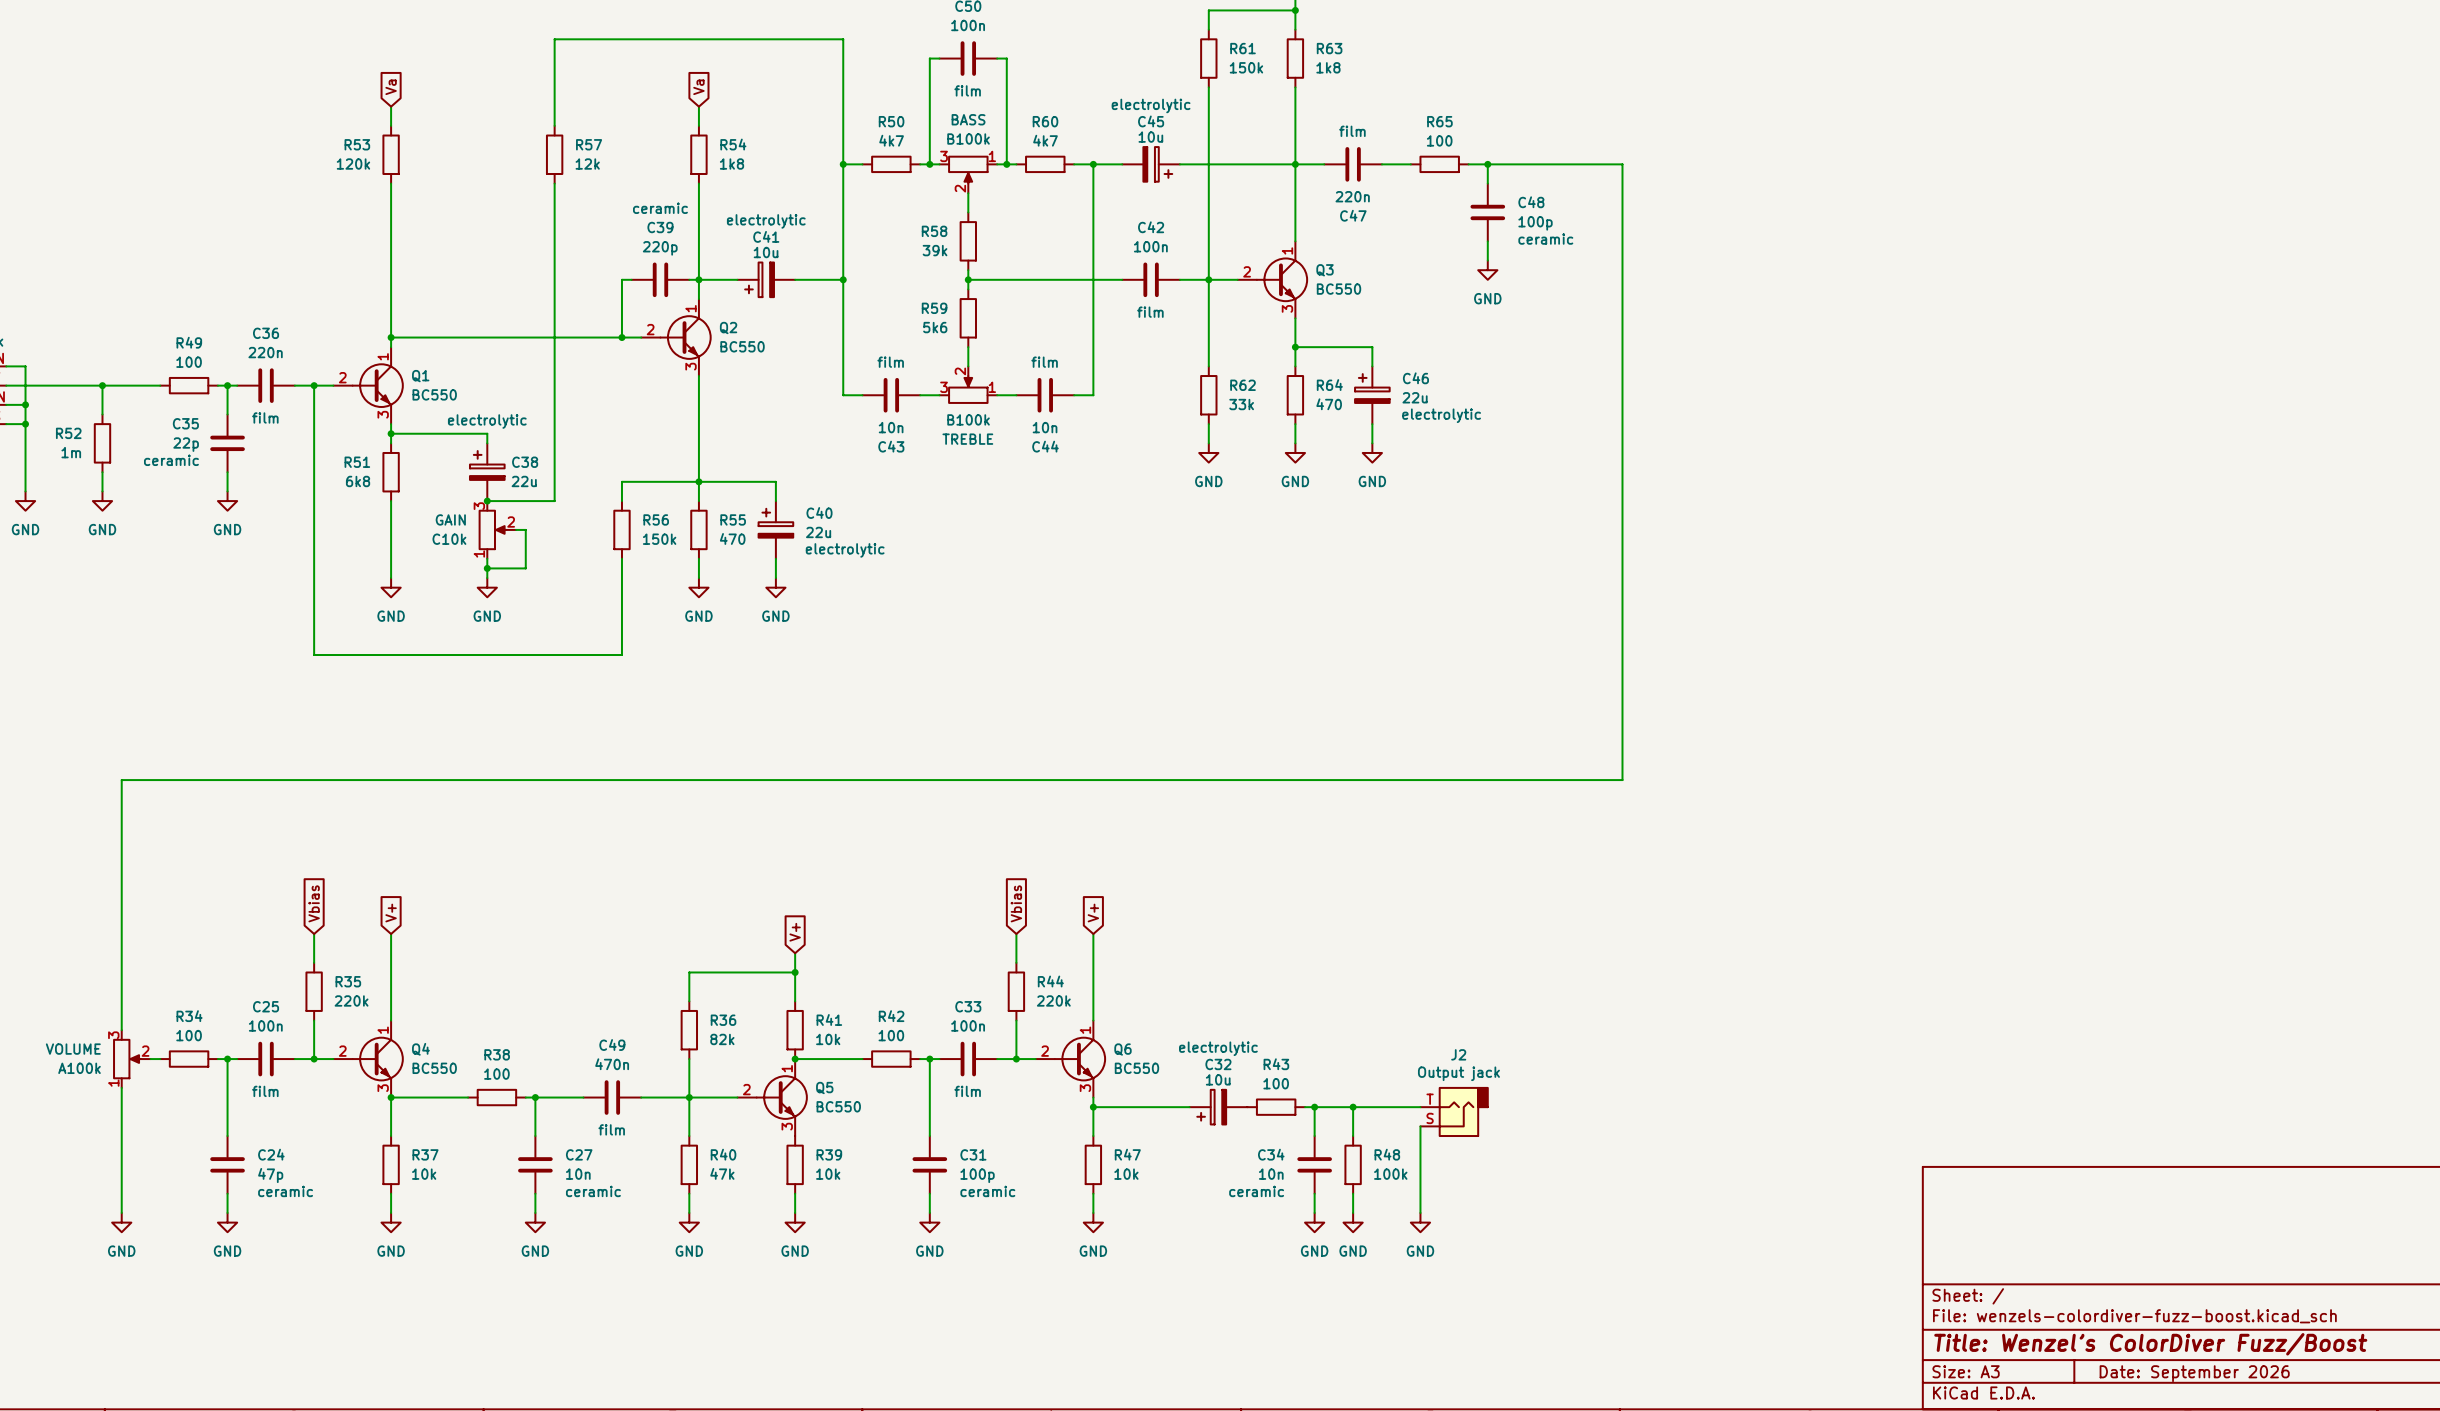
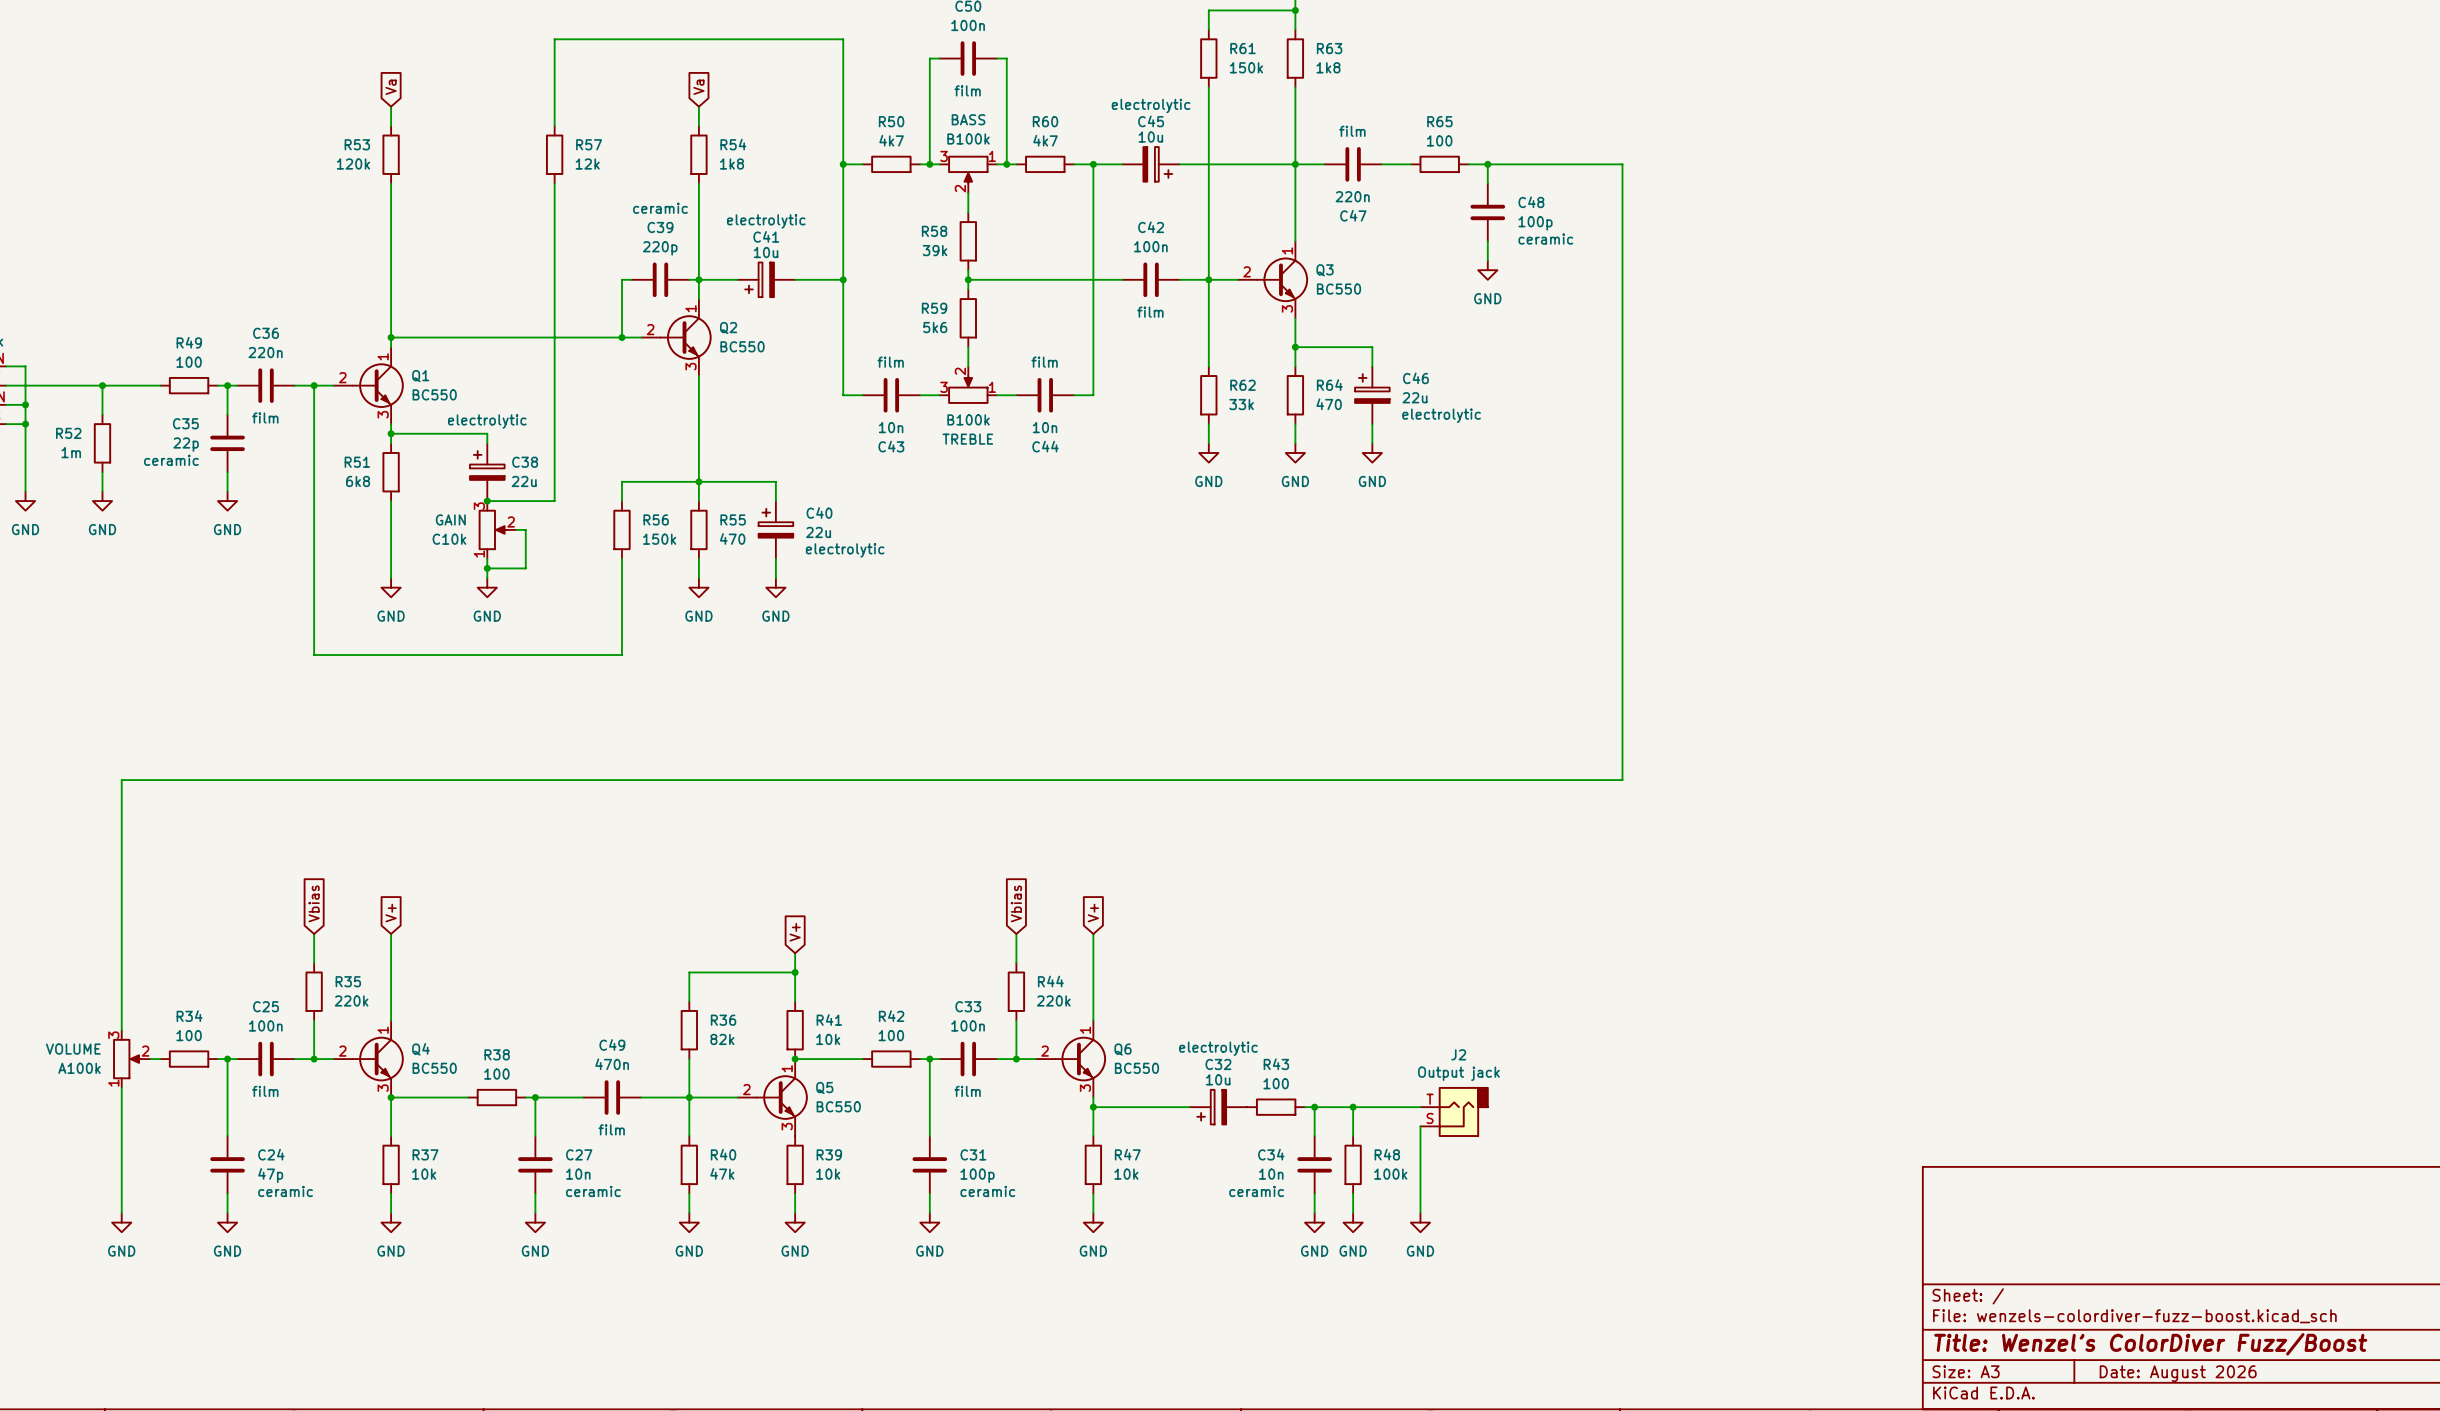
title block: Date: September 2026 (2194, 1373) -> Date: August 2026 (2178, 1373)

